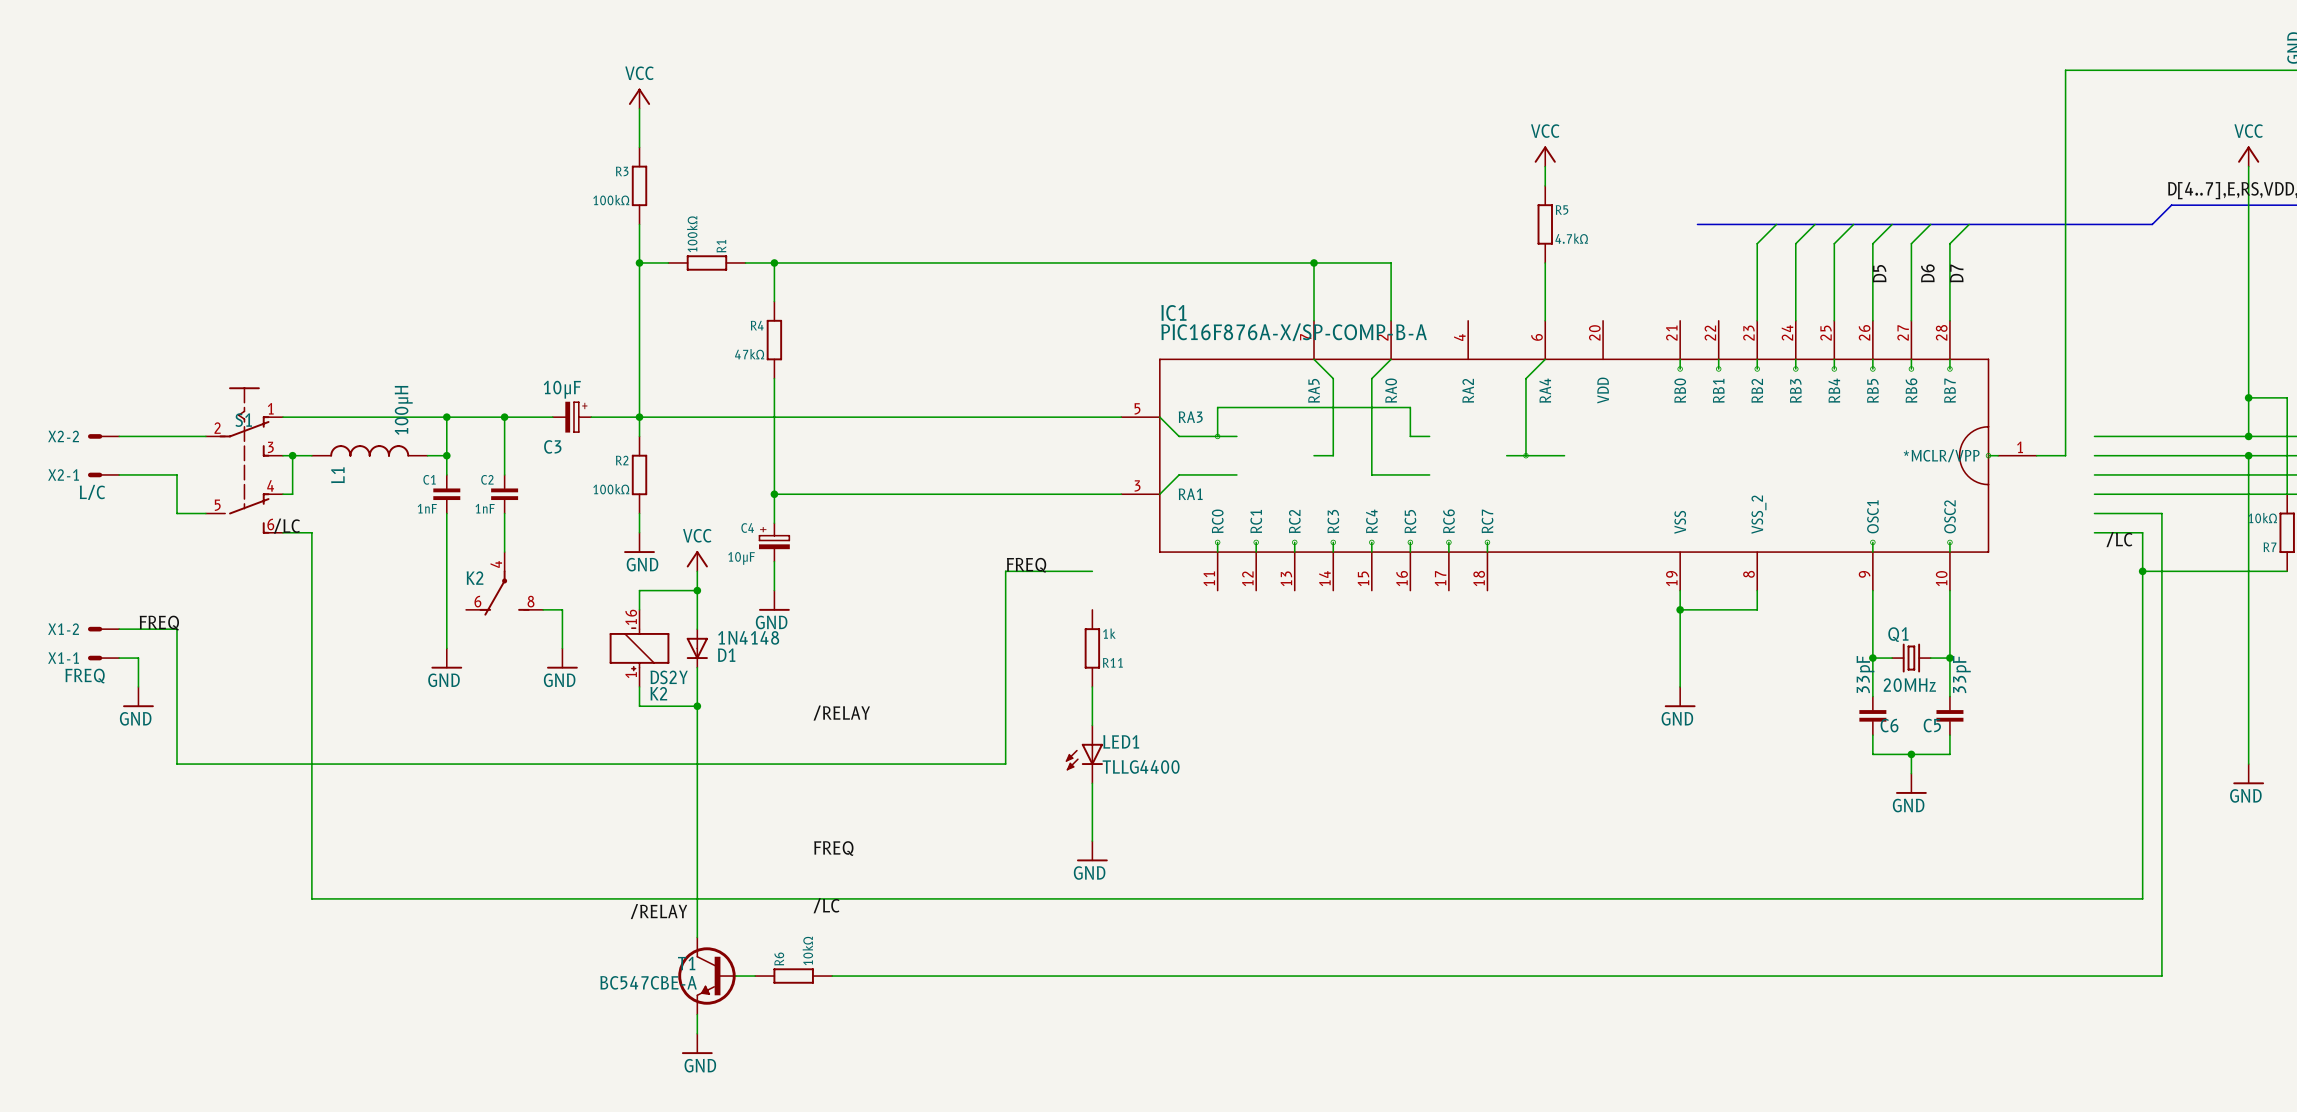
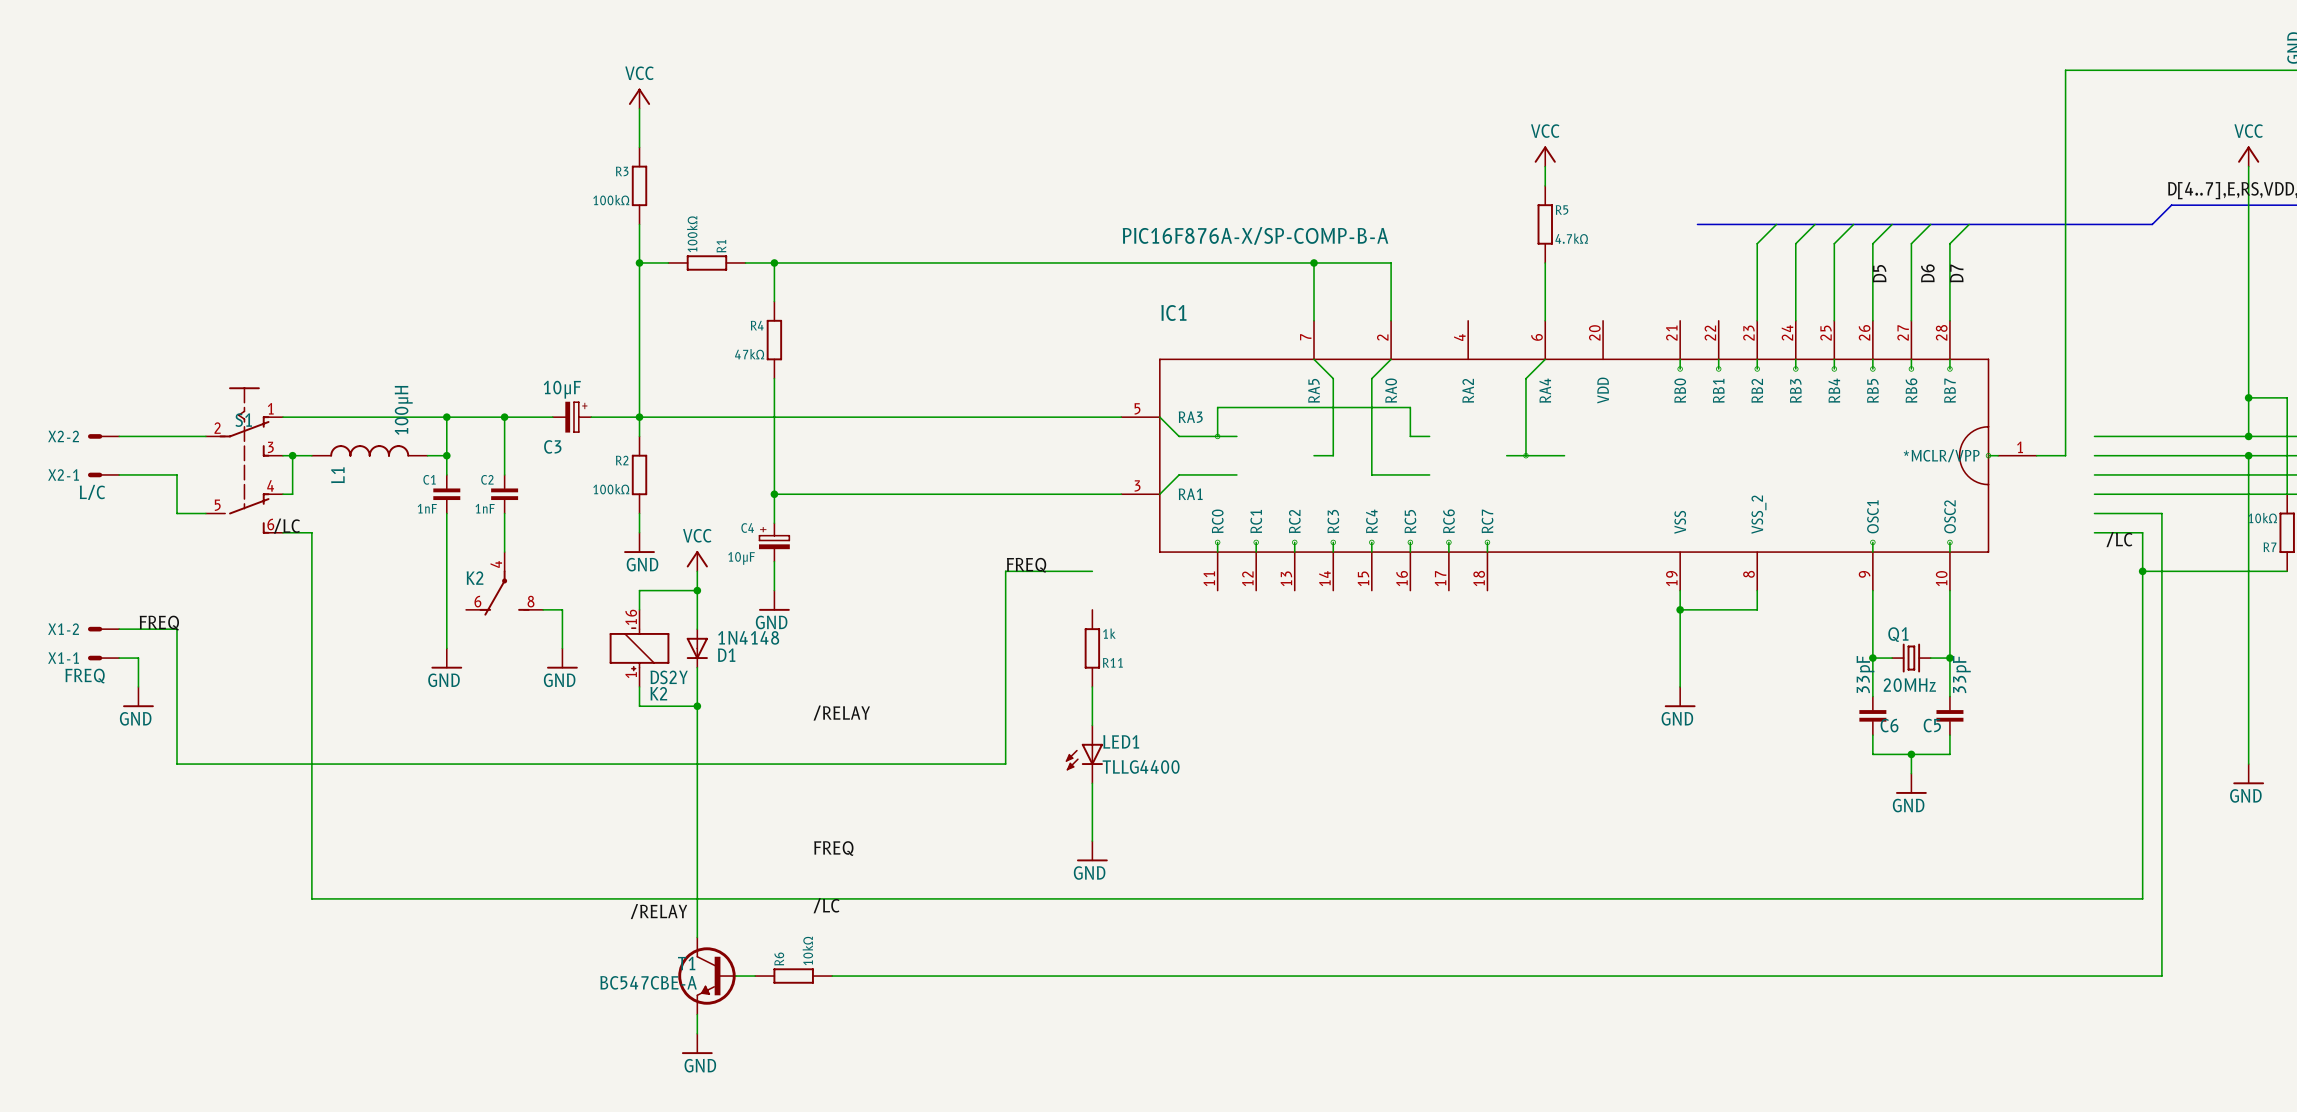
IC1 value position: PIC16F876A-X/SP-COMP-B-A (1294, 332) -> PIC16F876A-X/SP-COMP-B-A (1255, 235)

